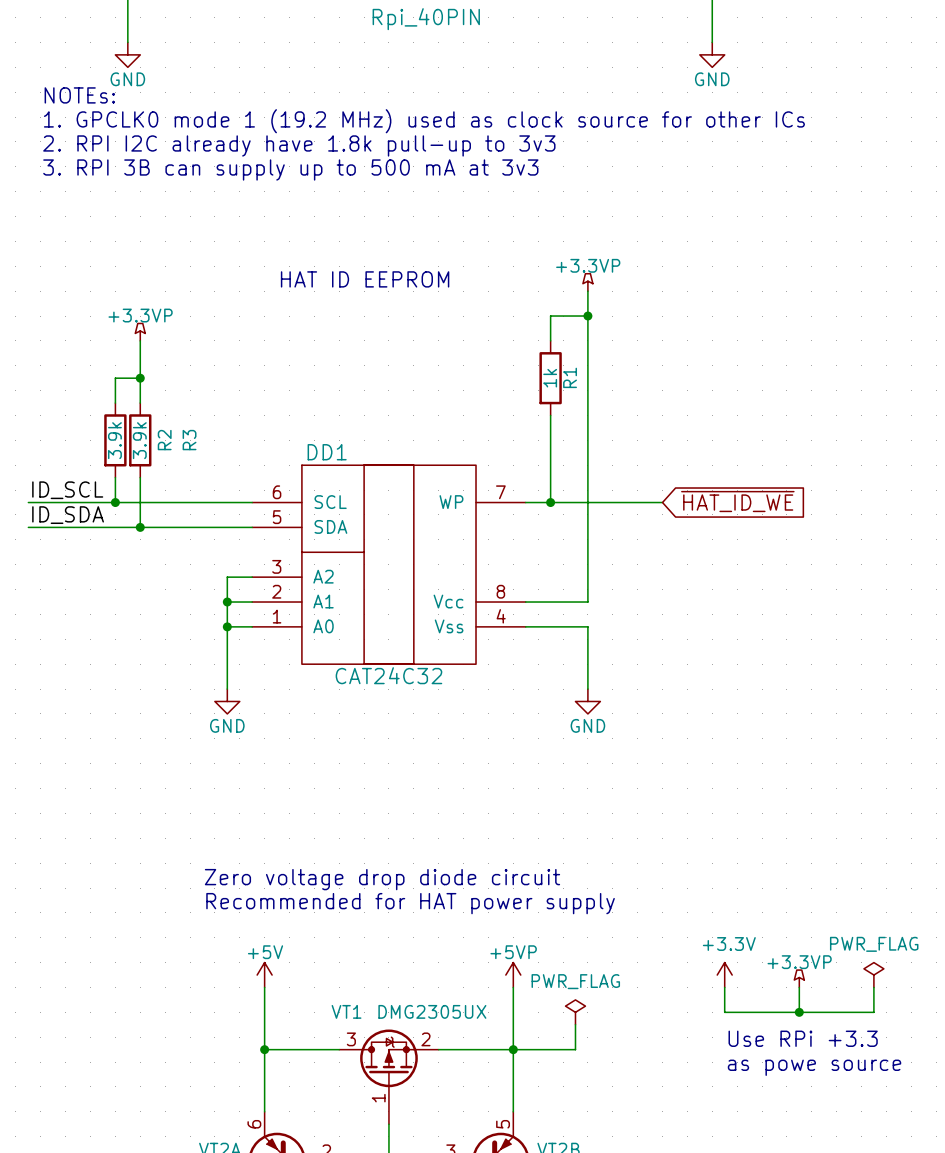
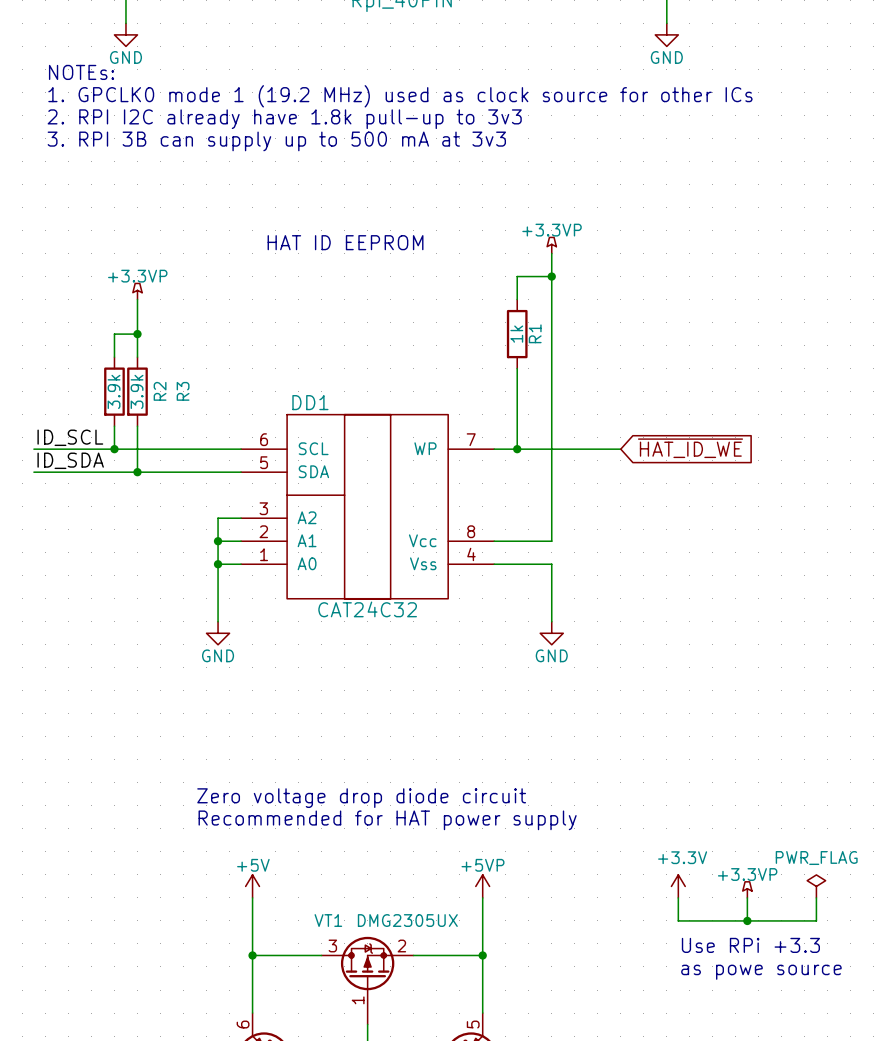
power symbol: PWR_FLAG (575, 1012) -> none
wire: (575, 1024) (575, 1049) (513, 1049) -> none

